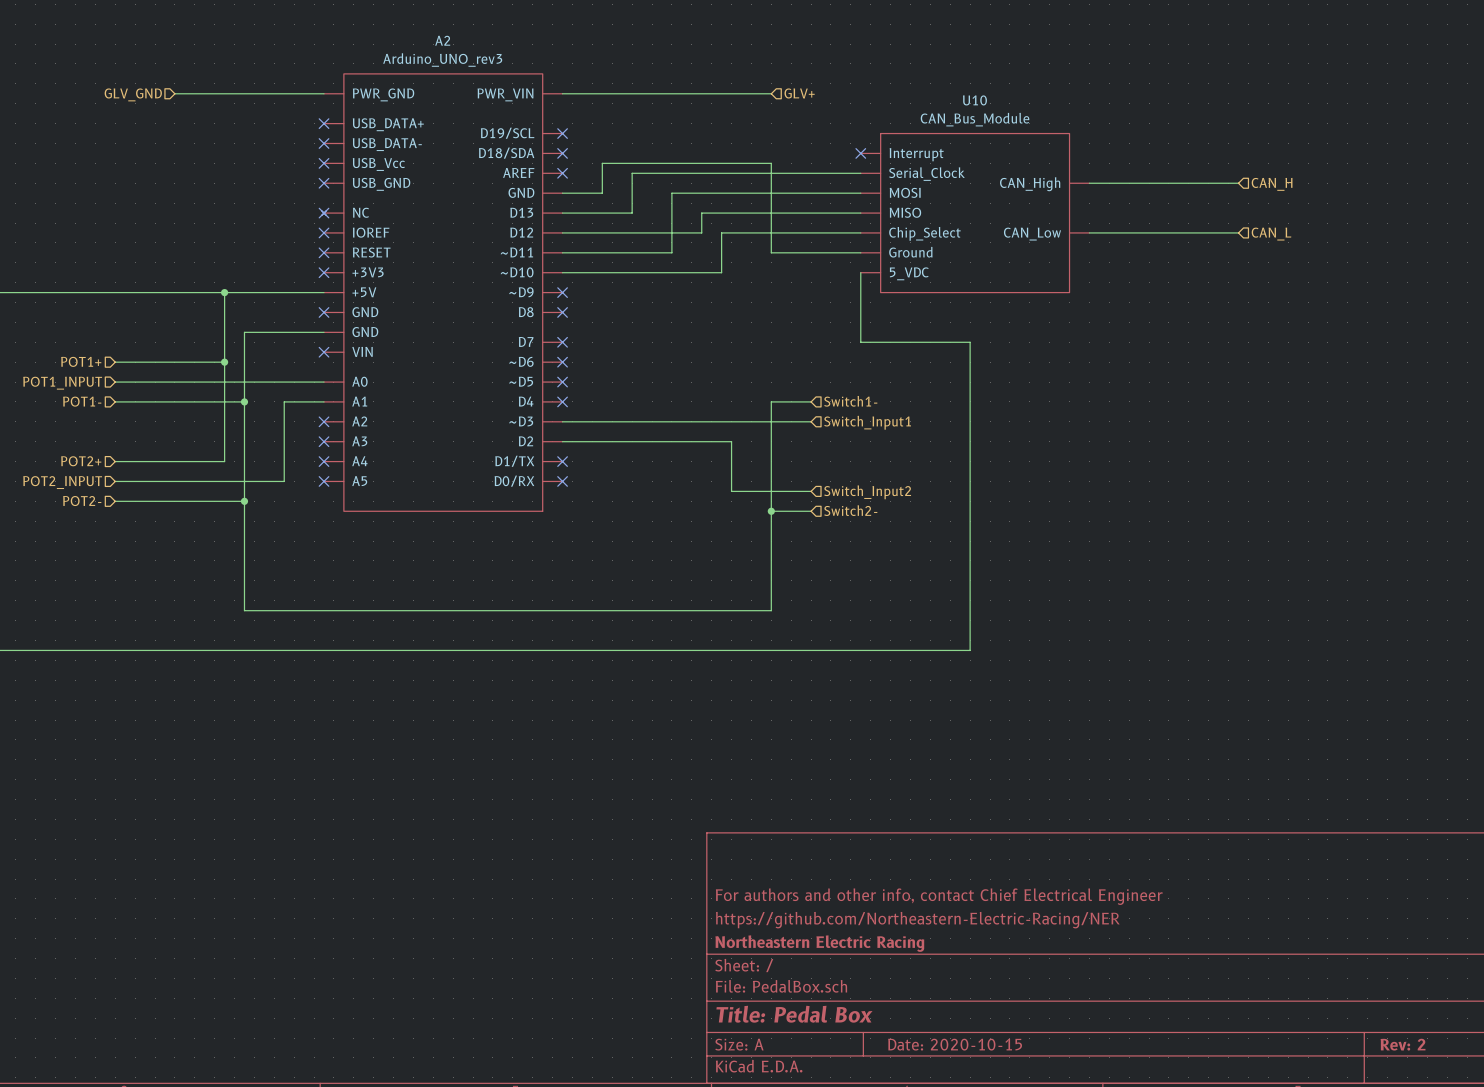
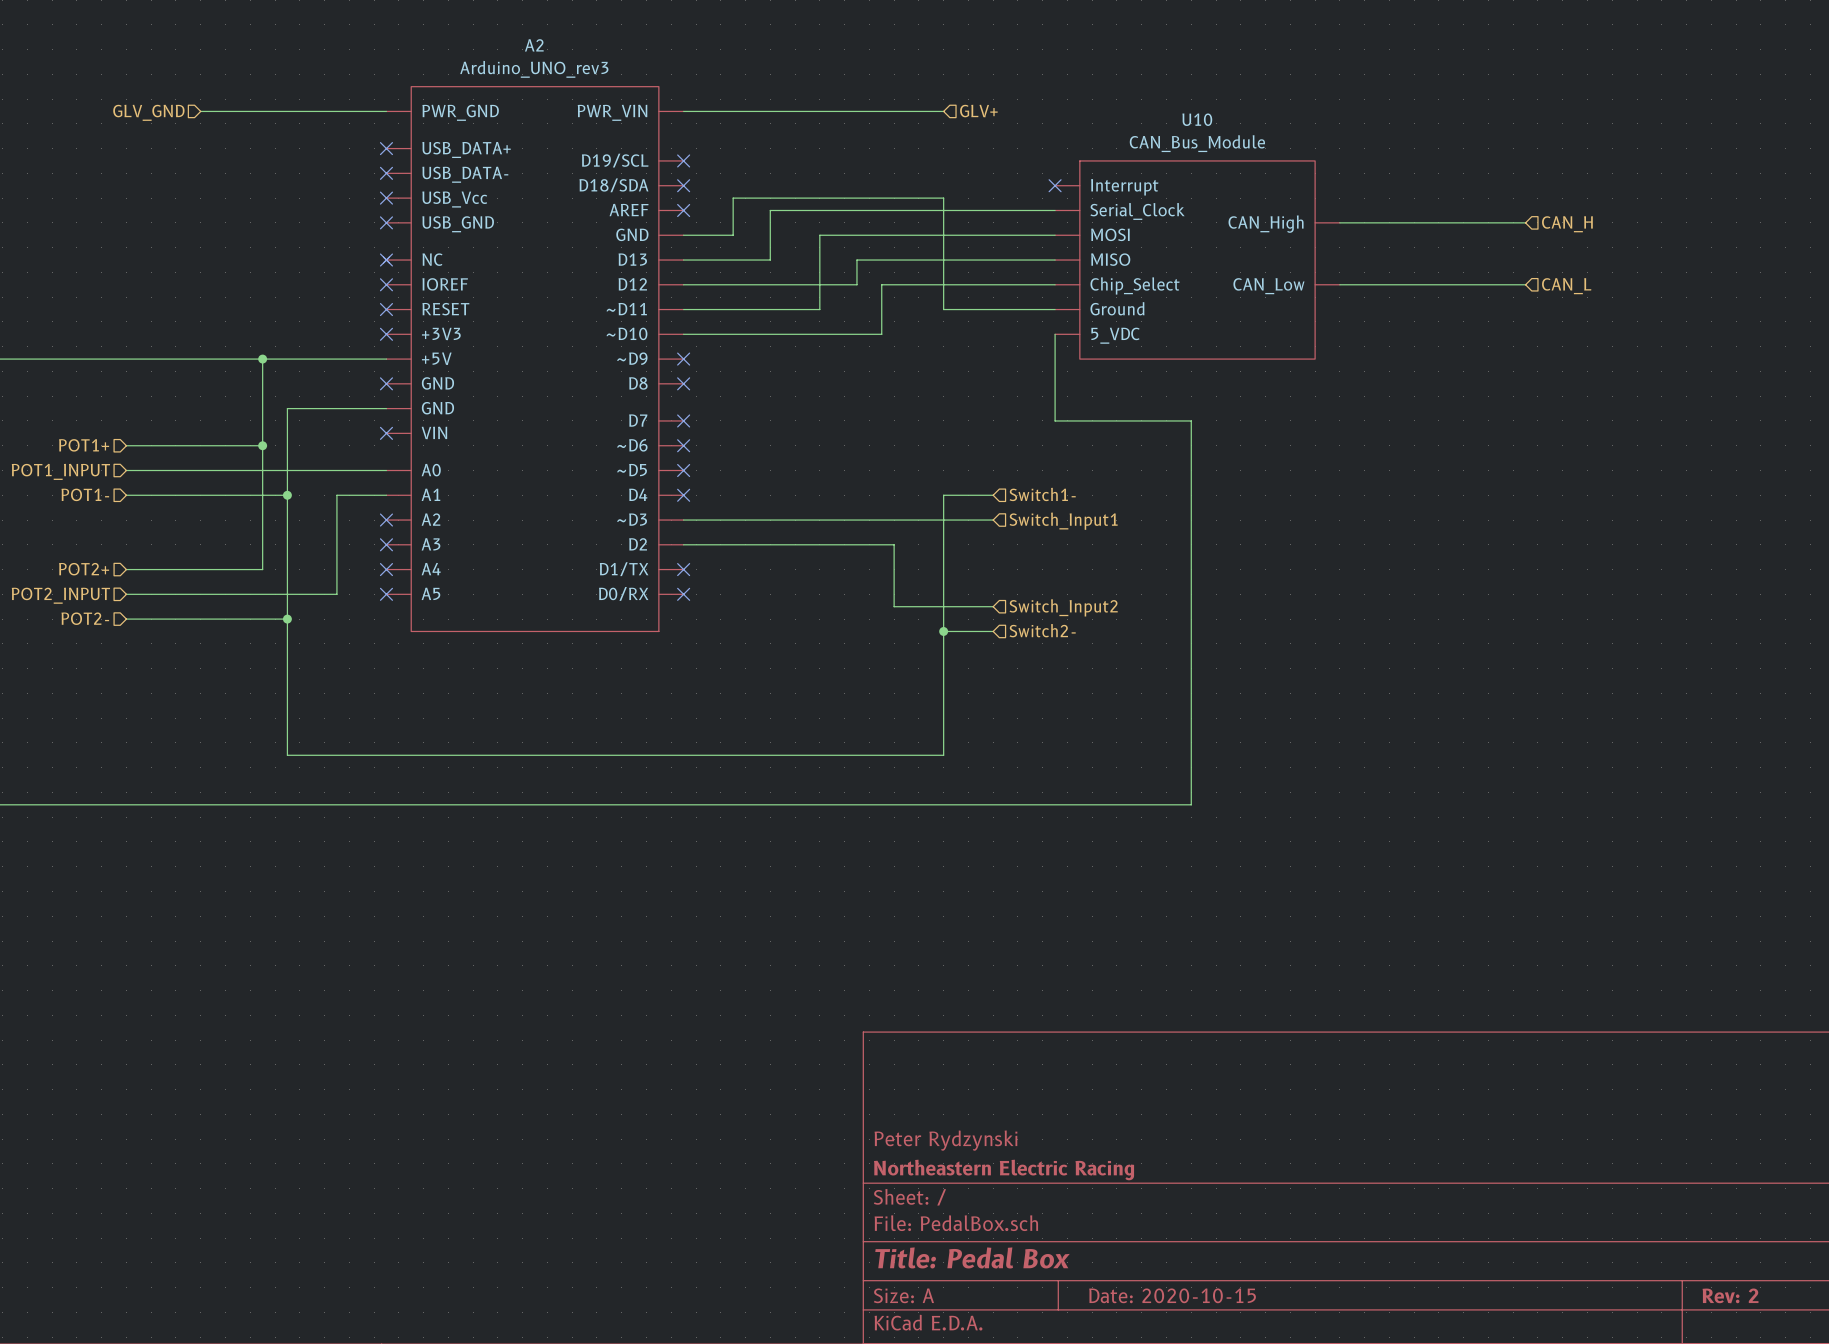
title block: For authors and other info, contact Chief Electrical Engineer (939, 896) -> none
title block: https://github.com/Northeastern-Electric-Racing/NER (917, 920) -> Peter Rydzynski (945, 1140)

